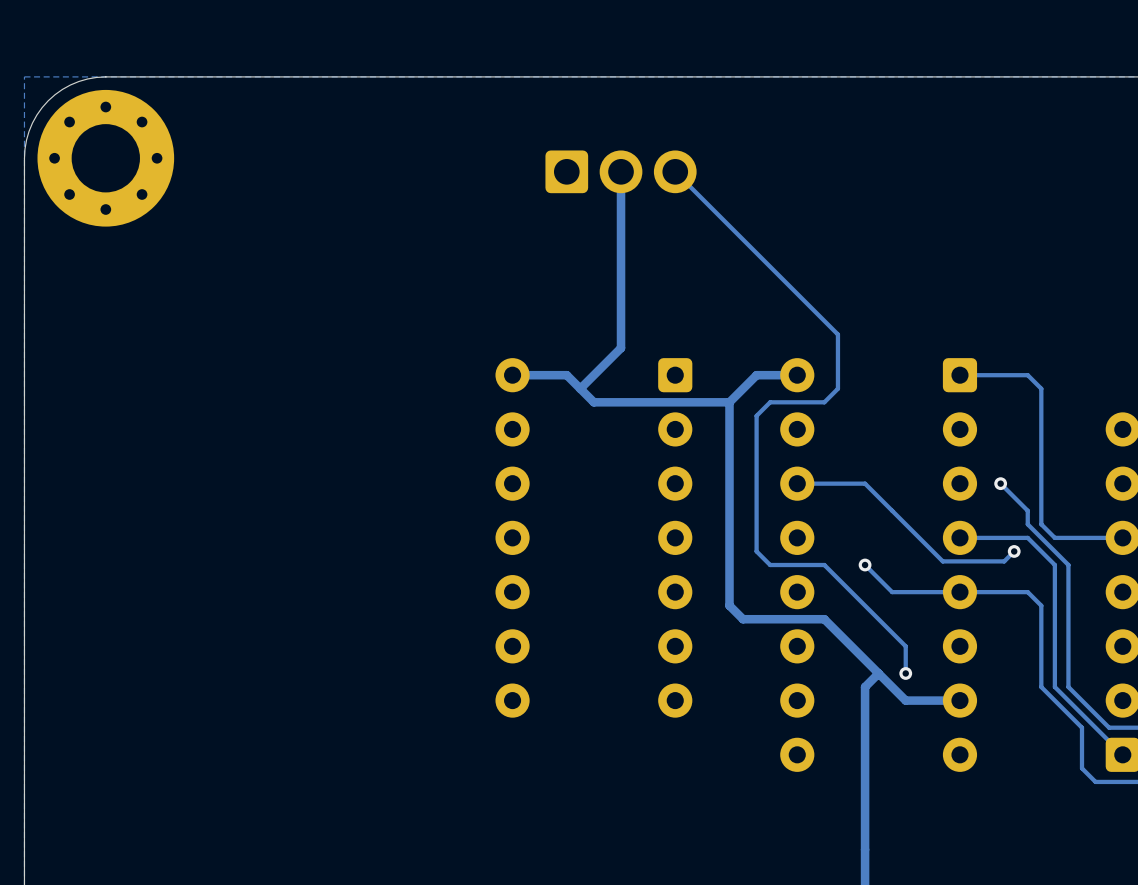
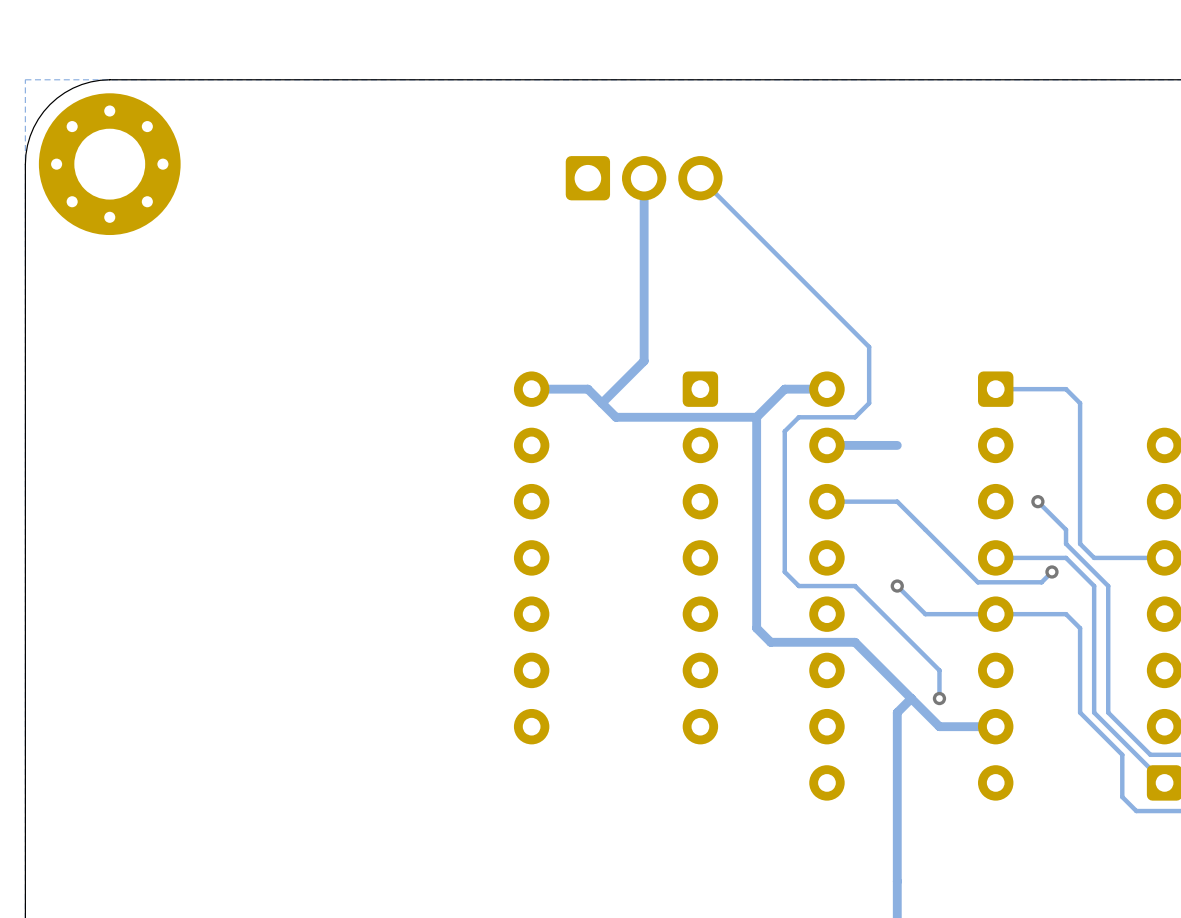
track: none -> (897, 445) (826, 445)

